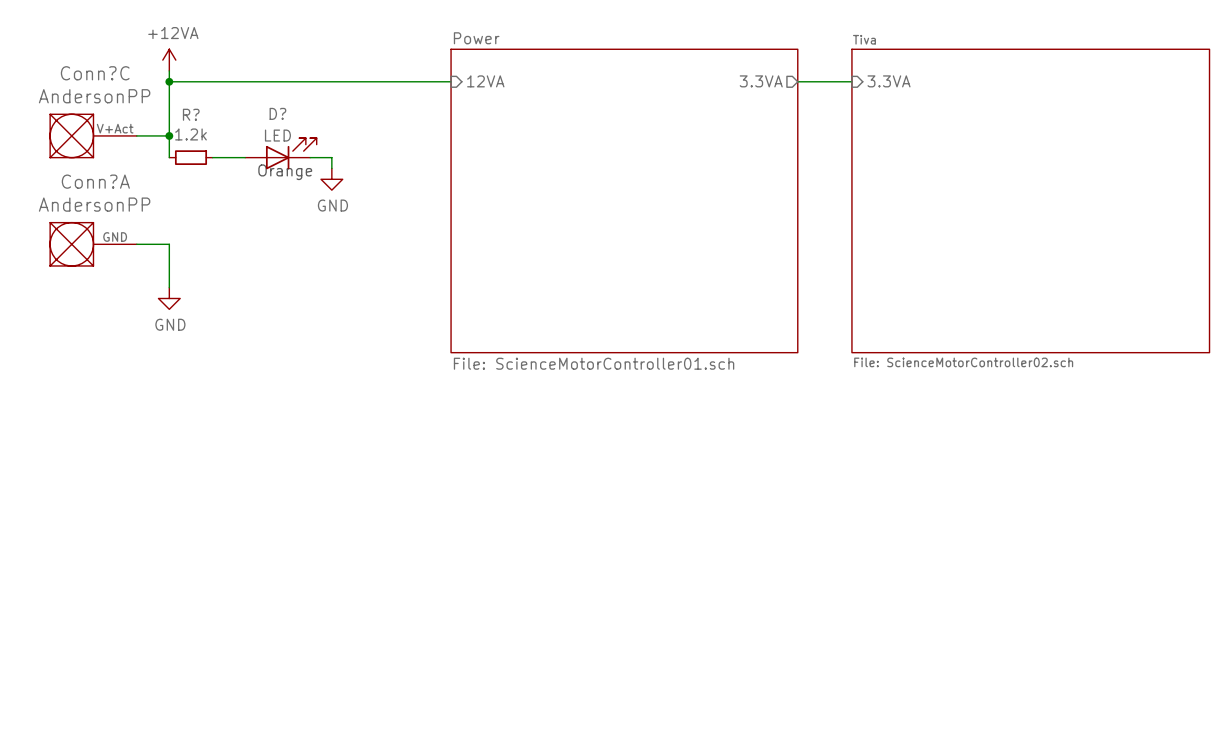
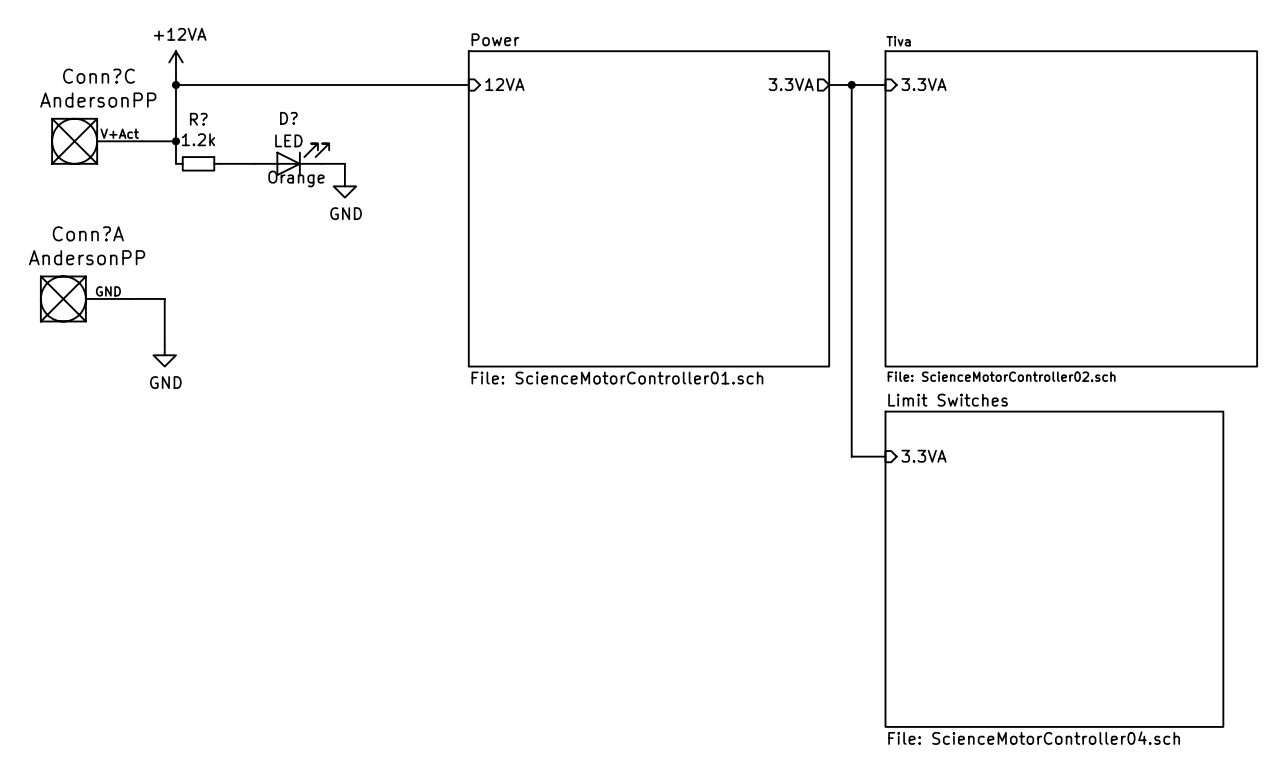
wire: none -> (851, 85) (851, 456) (885, 456)
junction: none -> (851, 85)
Conn?A position: (93, 244) -> (85, 298)
wire: (136, 244) (169, 244) (169, 287) -> (130, 298) (164, 298) (164, 344)
power symbol position: GND (169, 298) -> GND (164, 355)
sheet pin: none -> 3.3VA (924, 456)
sheet Limit Switches: none -> File: ScienceMotorController04.sch (1054, 569)

